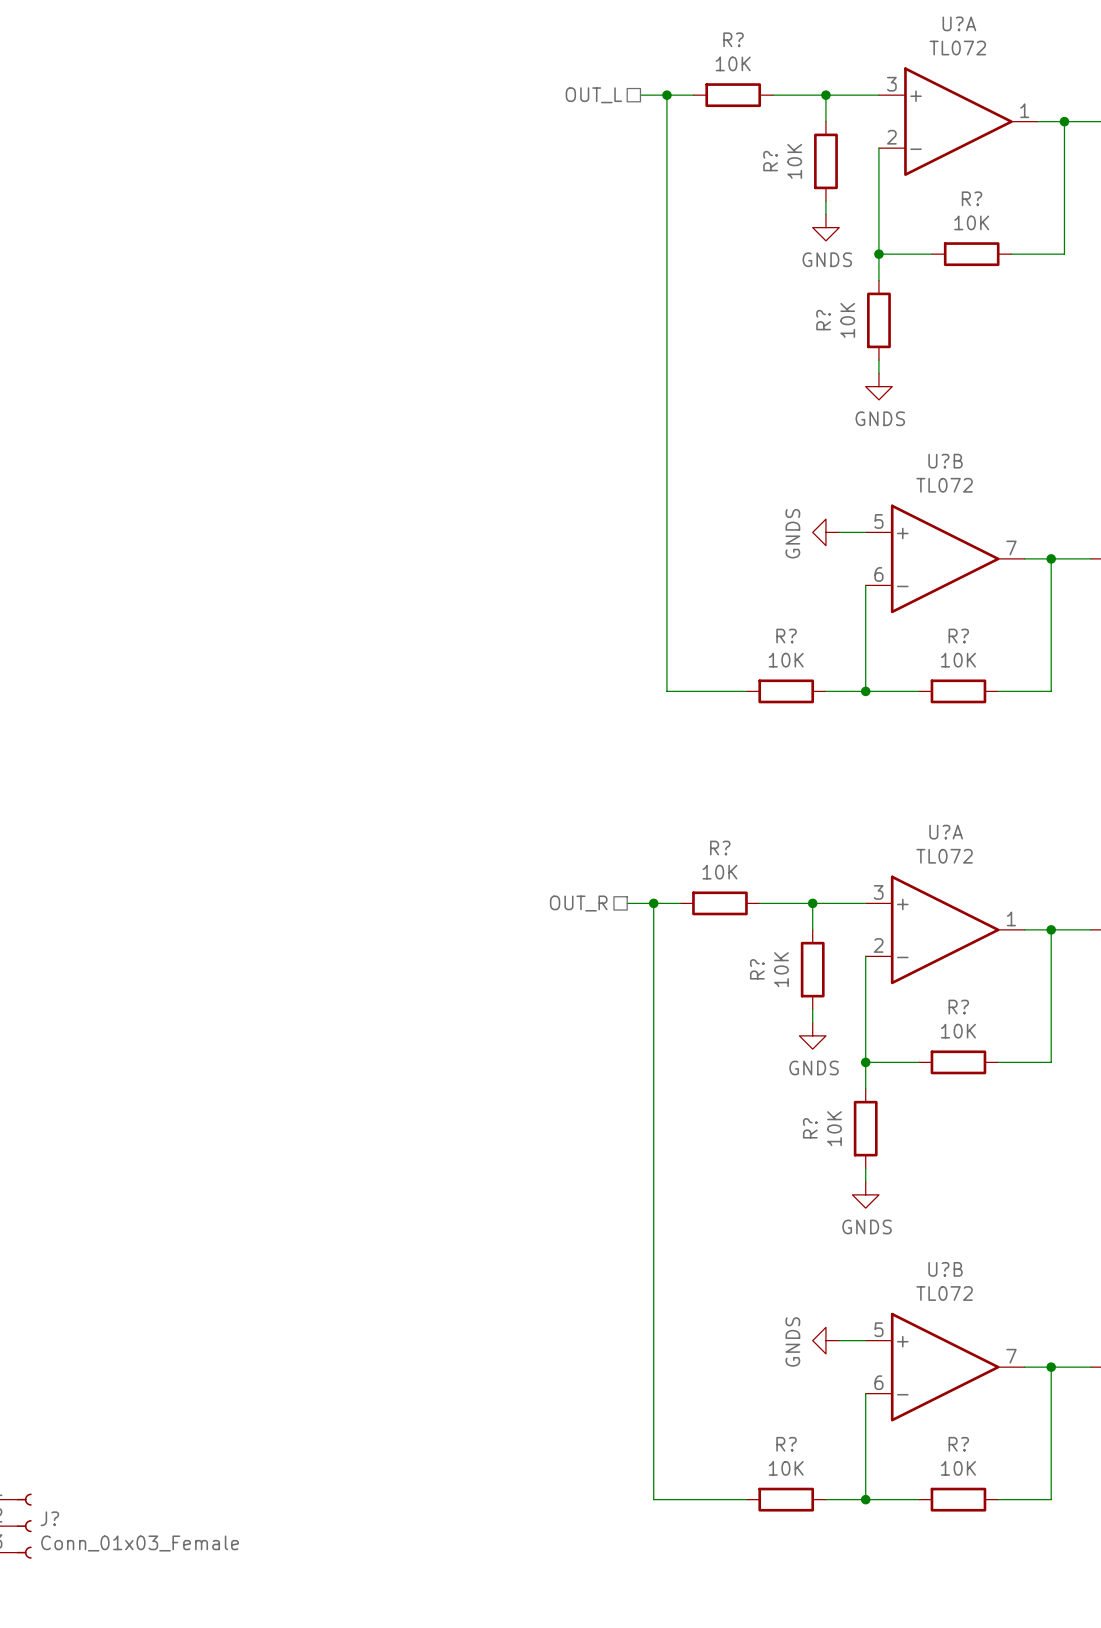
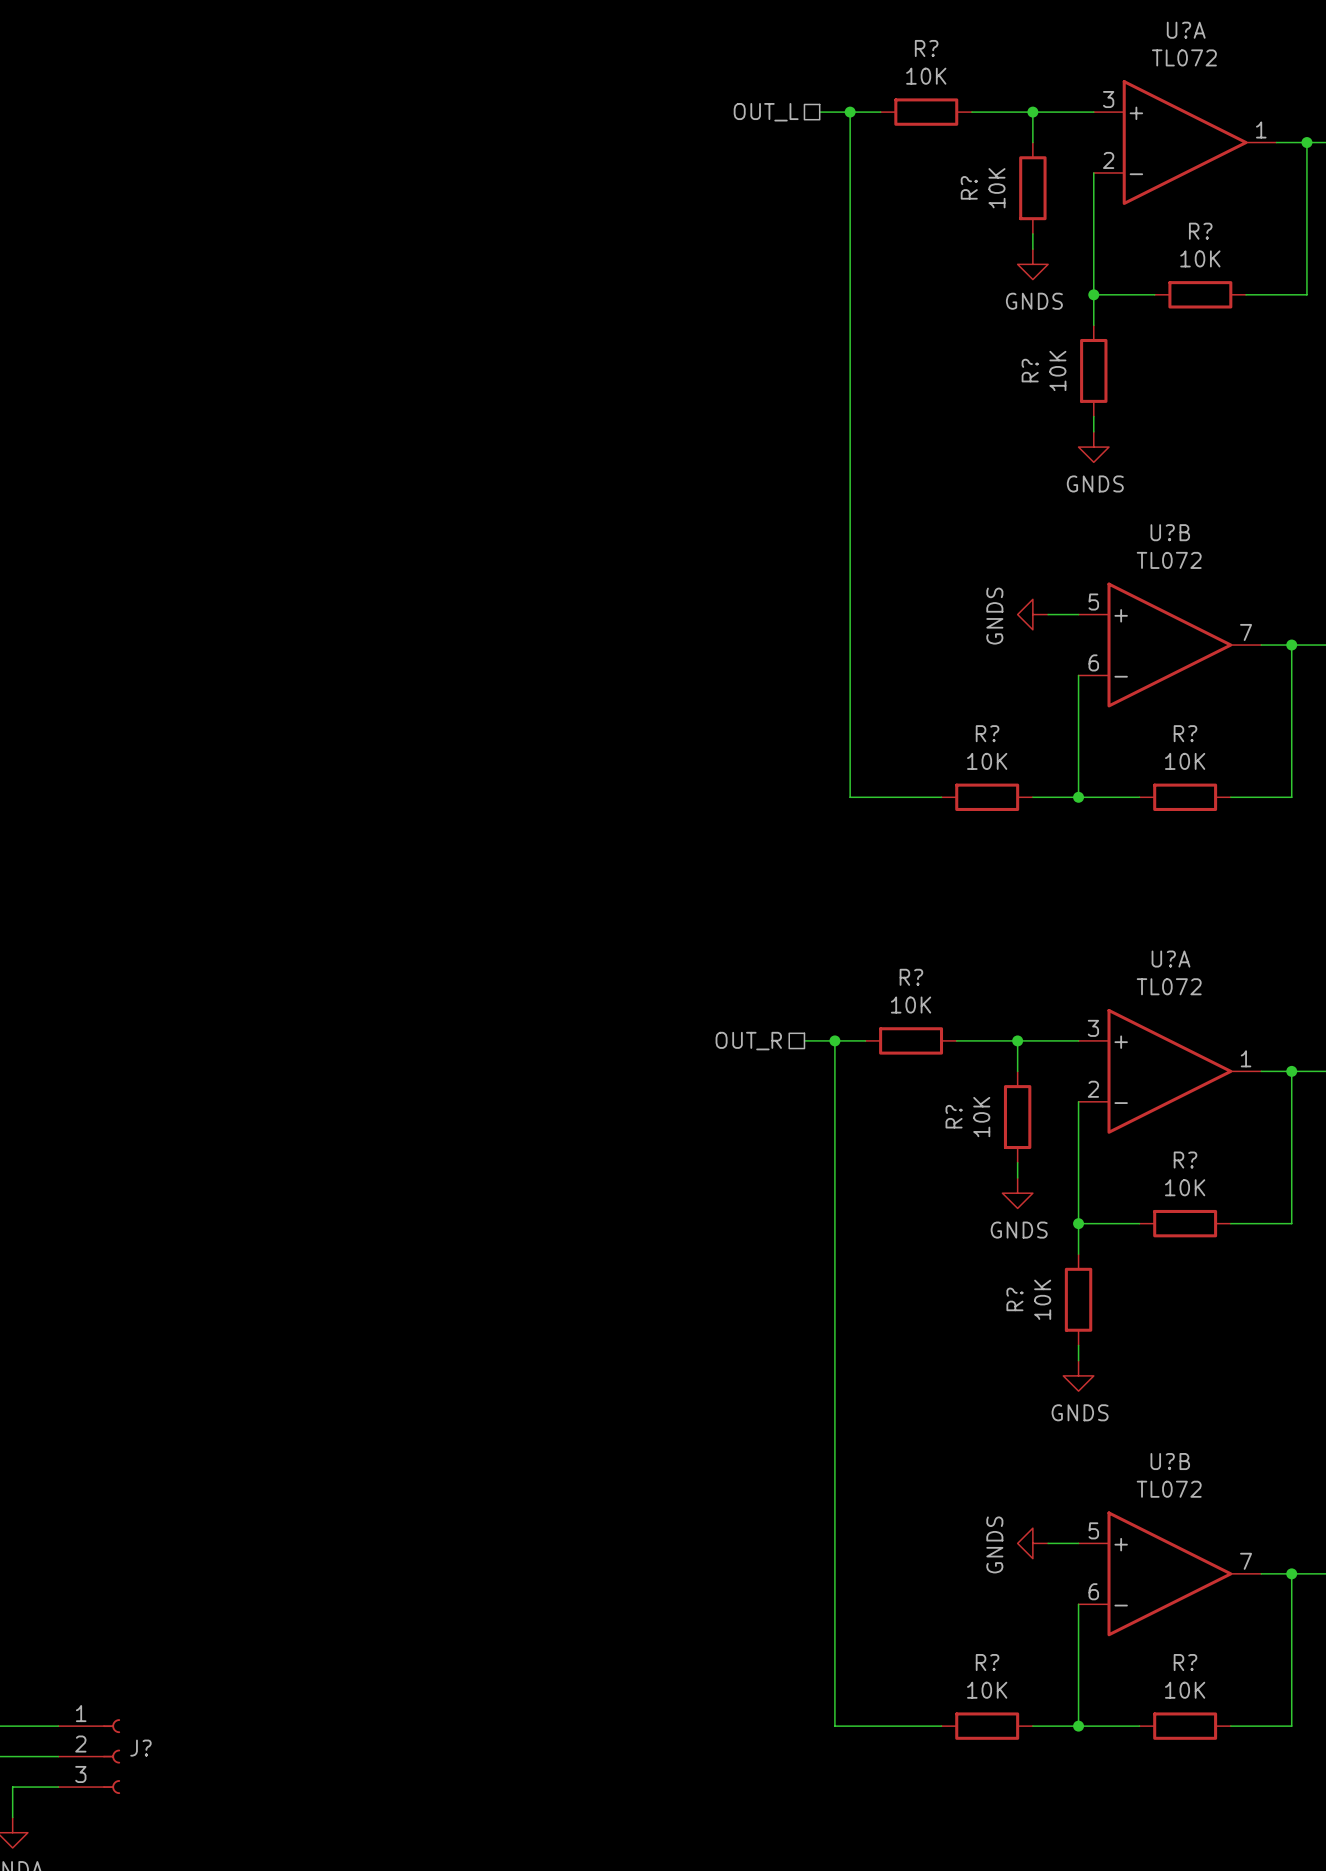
J? value: Conn_01x03_Female (140, 1543) -> none

